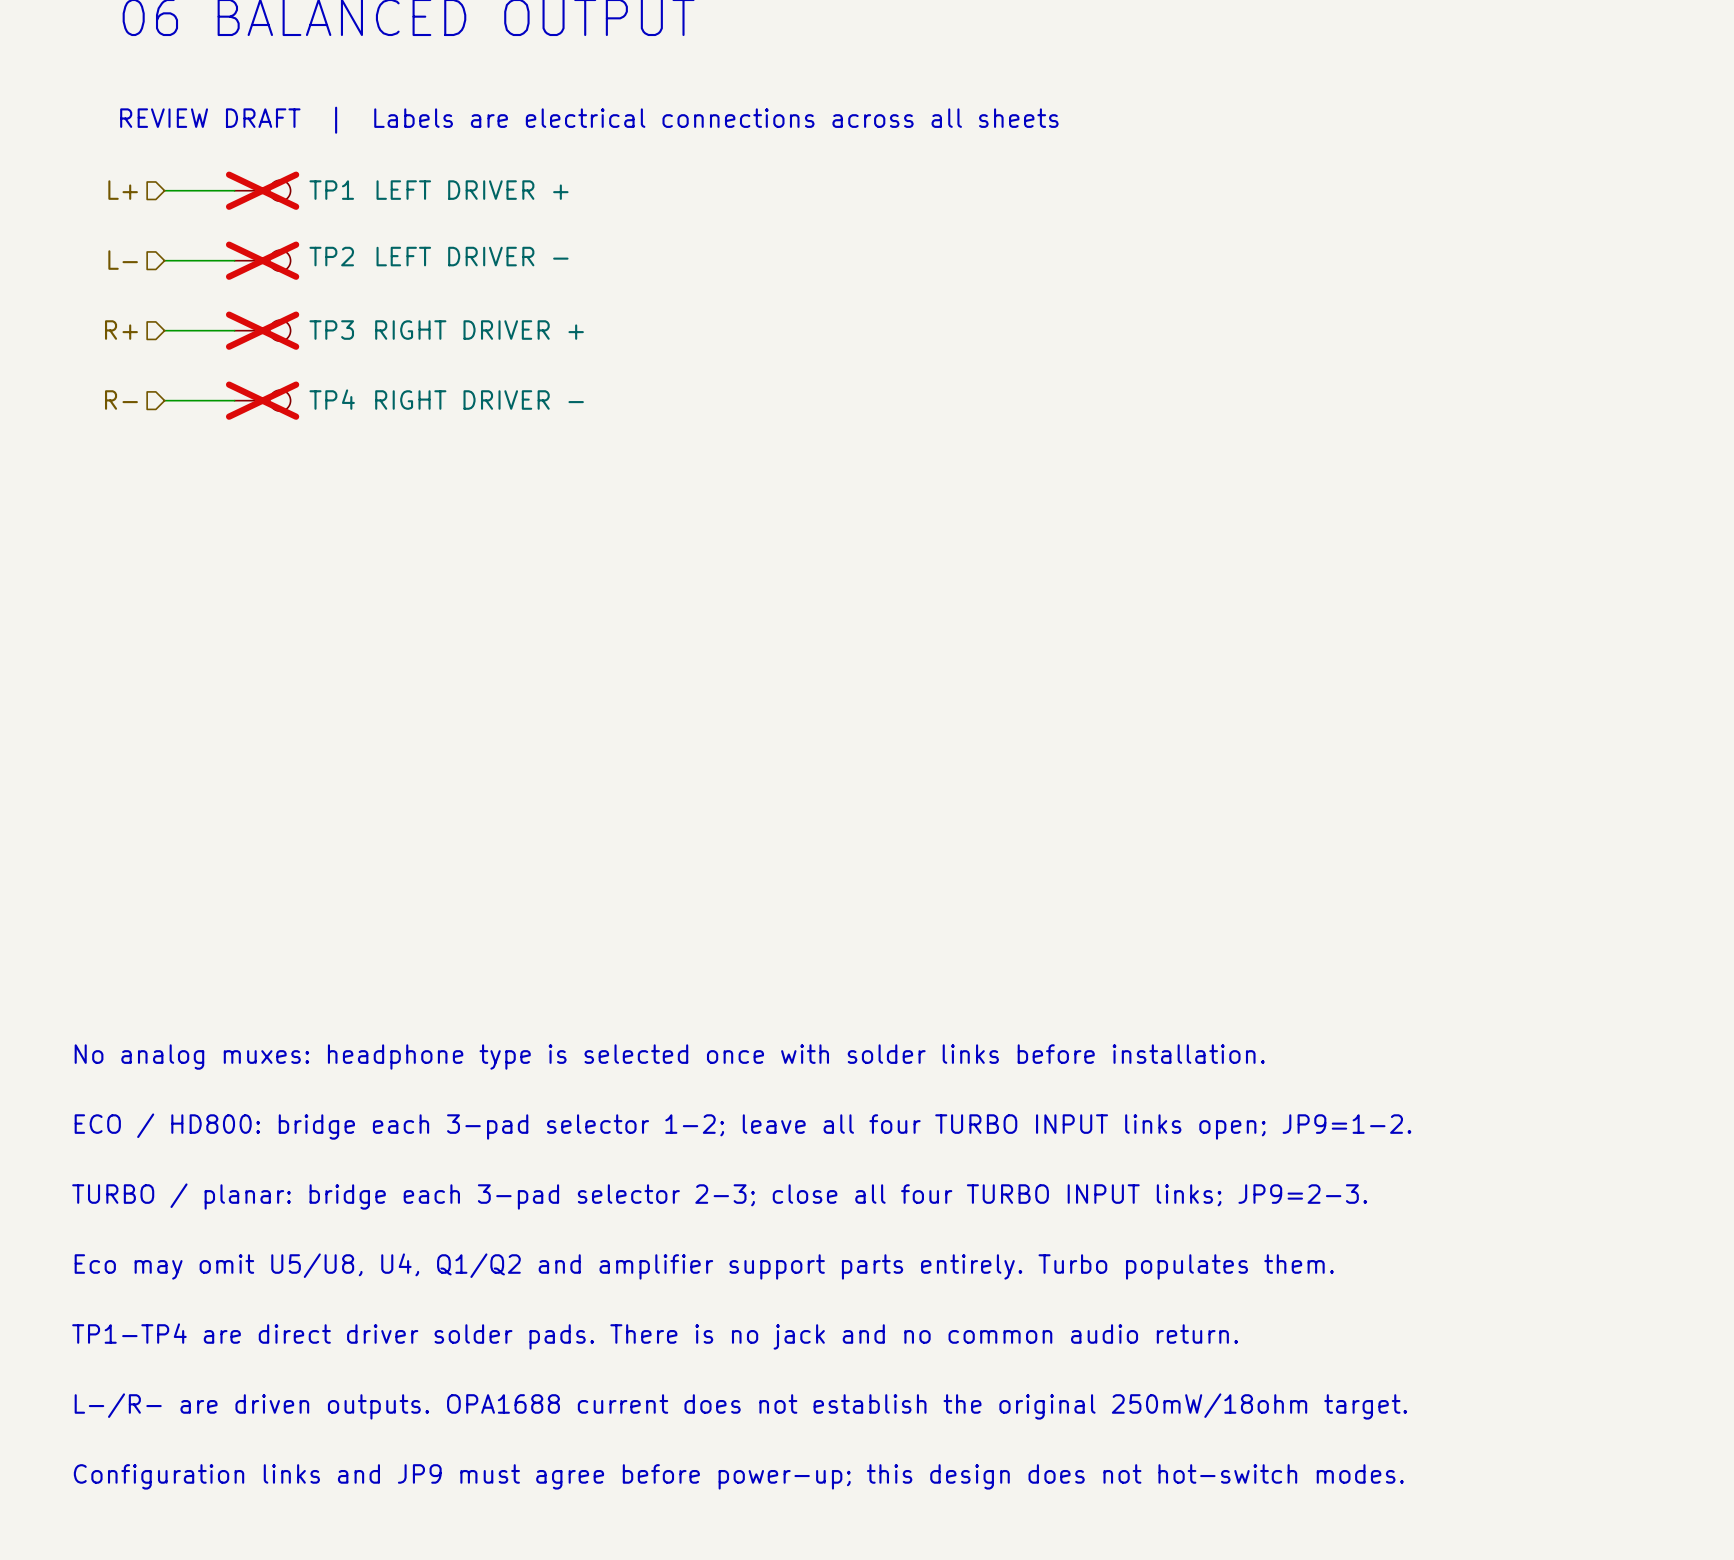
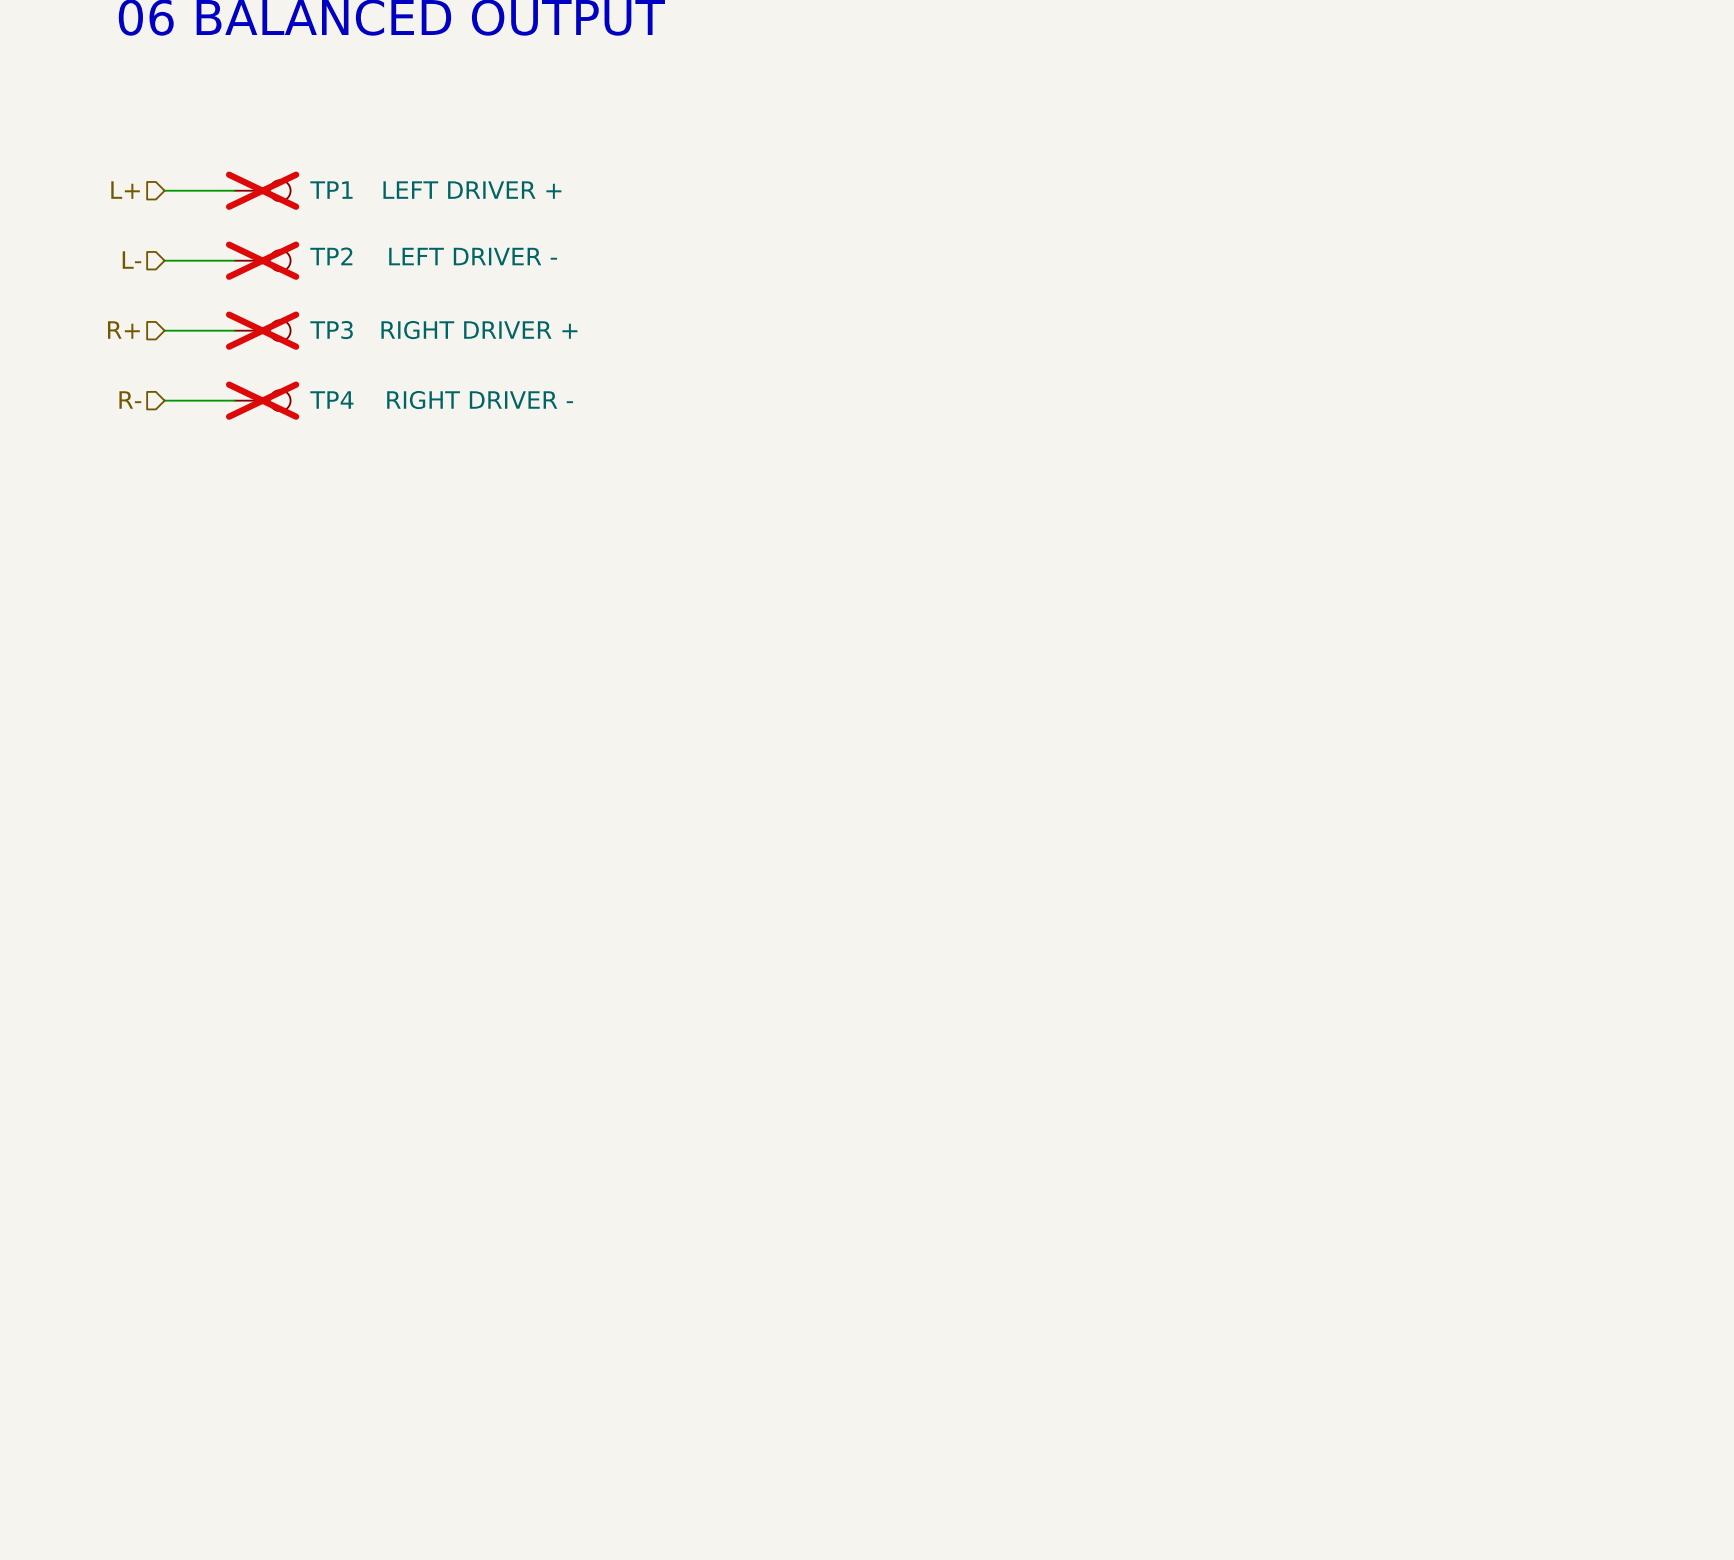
text: REVIEW DRAFT | Labels are electrical connections across all sheets (589, 120) -> none
text: No analog muxes: headphone type is selected once with solder links before installation. (669, 1057) -> none
text: ECO / HD800: bridge each 3-pad selector 1-2; leave all four TURBO INPUT links open; JP9=1-2. (742, 1126) -> none
text: TURBO / planar: bridge each 3-pad selector 2-3; close all four TURBO INPUT links; JP9=2-3. (719, 1196) -> none
text: Eco may omit U5/U8, U4, Q1/Q2 and amplifier support parts entirely. Turbo populates them. (704, 1266) -> none
text: TP1-TP4 are direct driver solder pads. There is no jack and no common audio return. (655, 1336) -> none
text: L-/R- are driven outputs. OPA1688 current does not establish the original 250mW/18ohm target. (740, 1406) -> none
text: Configuration links and JP9 must agree before power-up; this design does not hot-switch modes. (738, 1476) -> none

